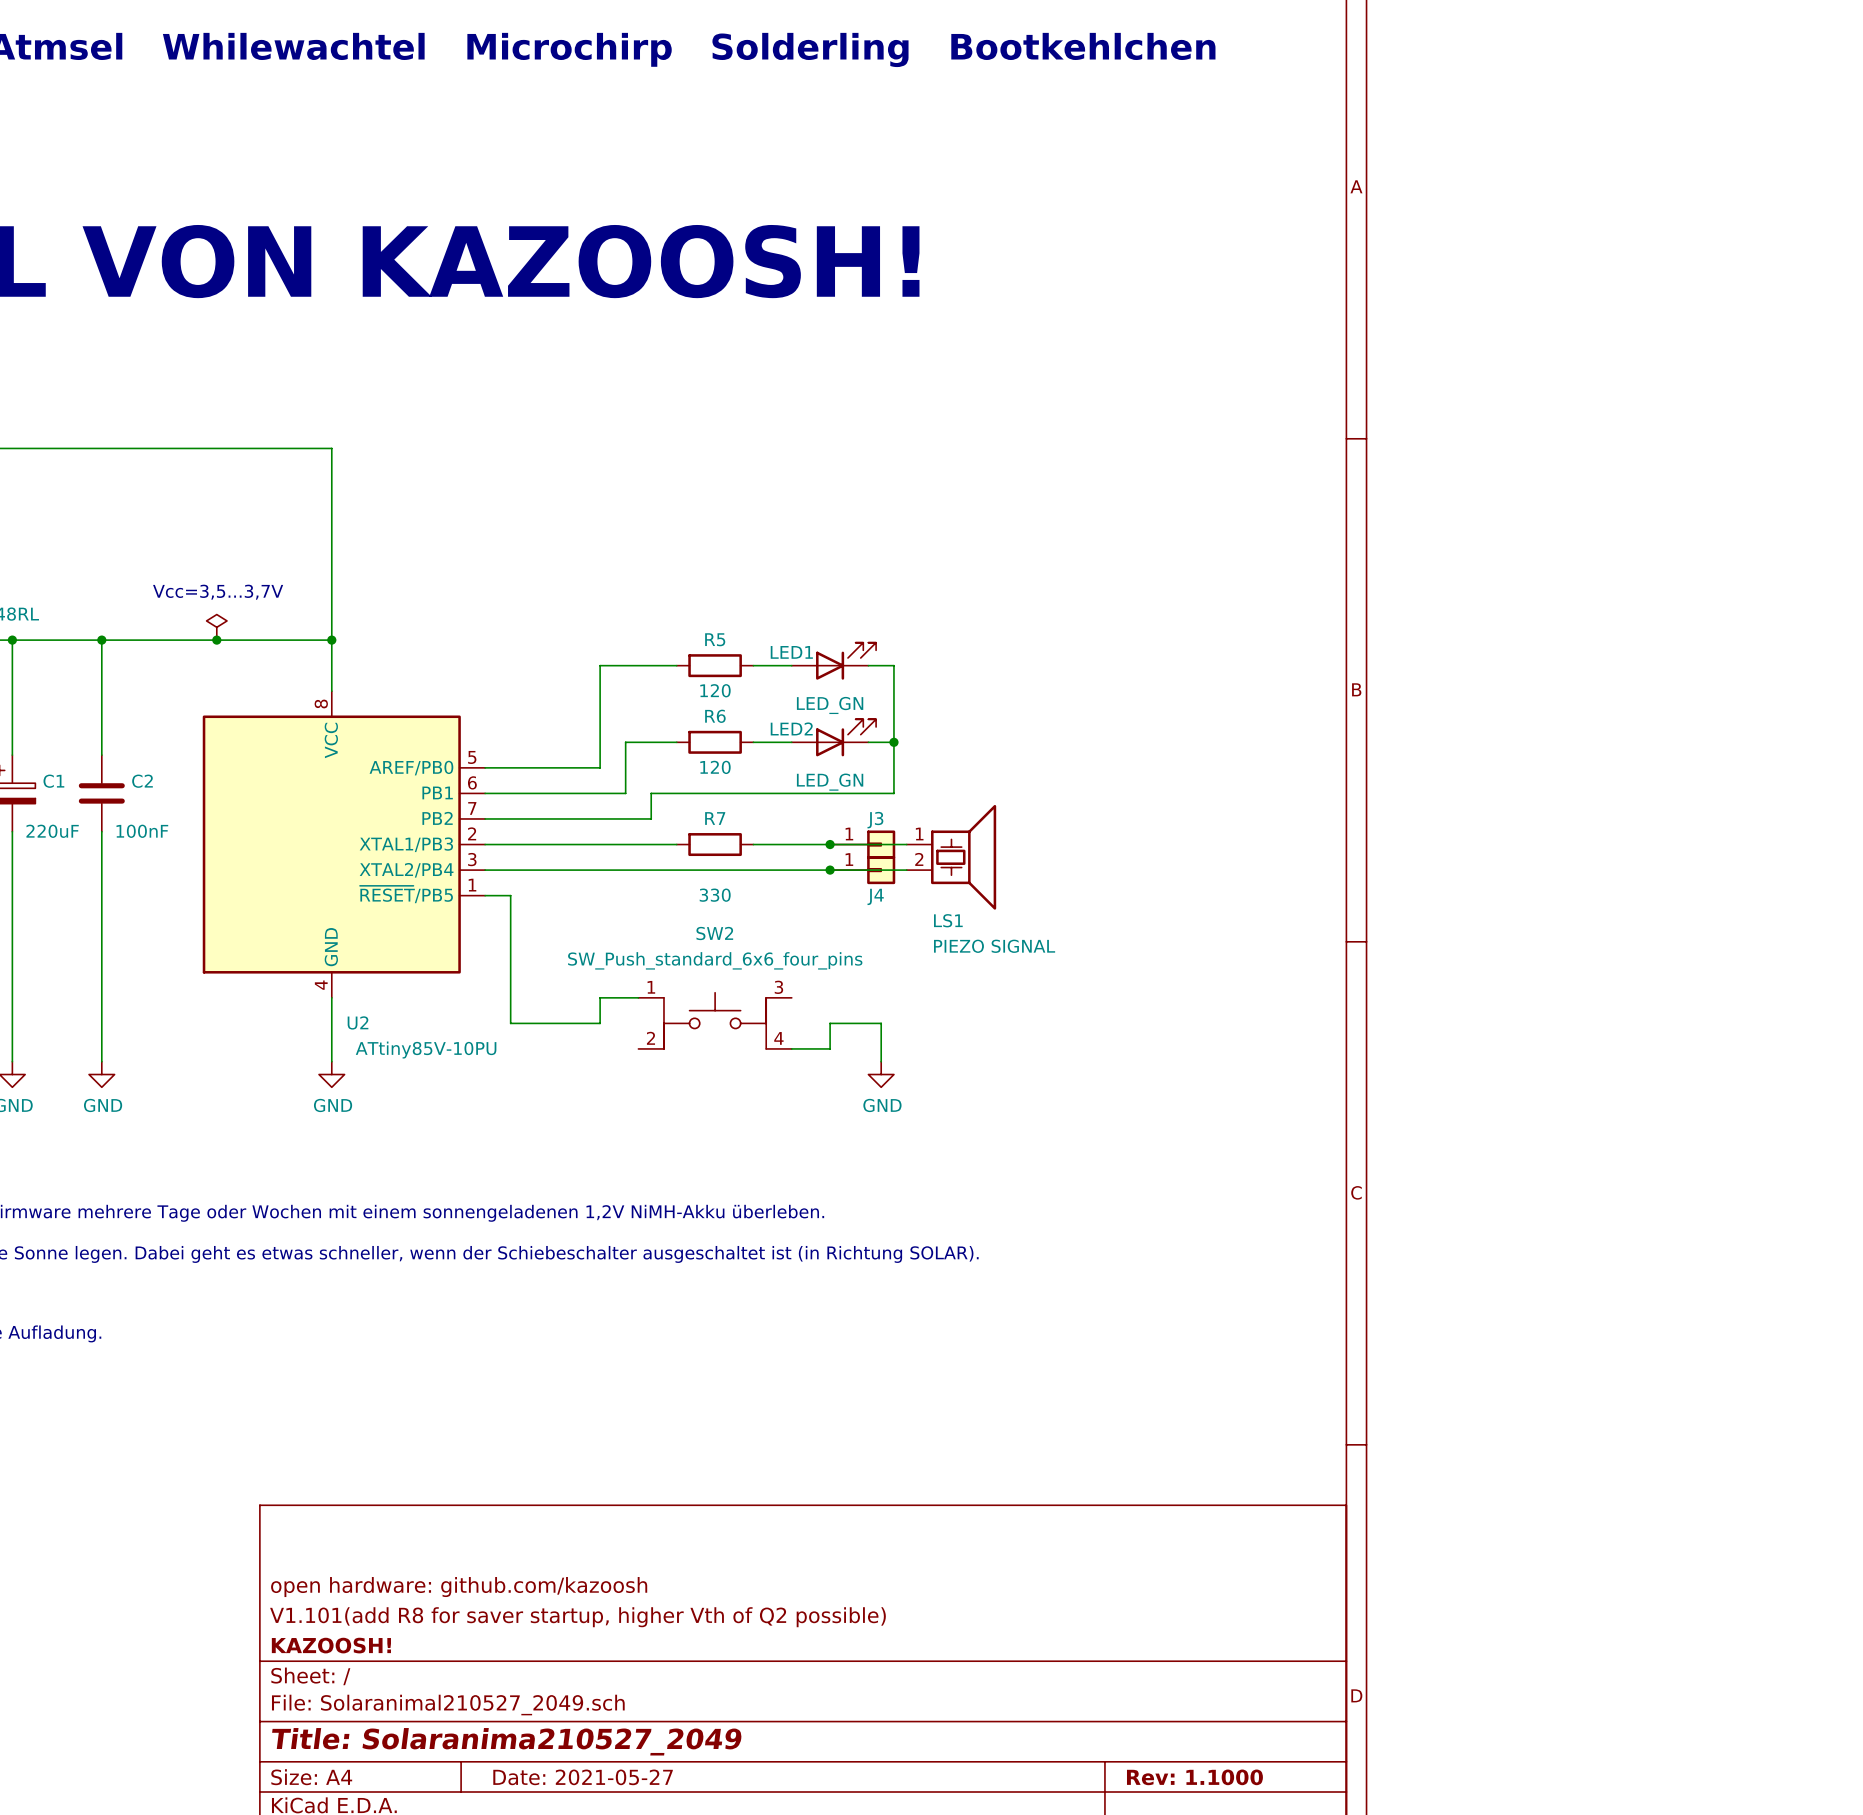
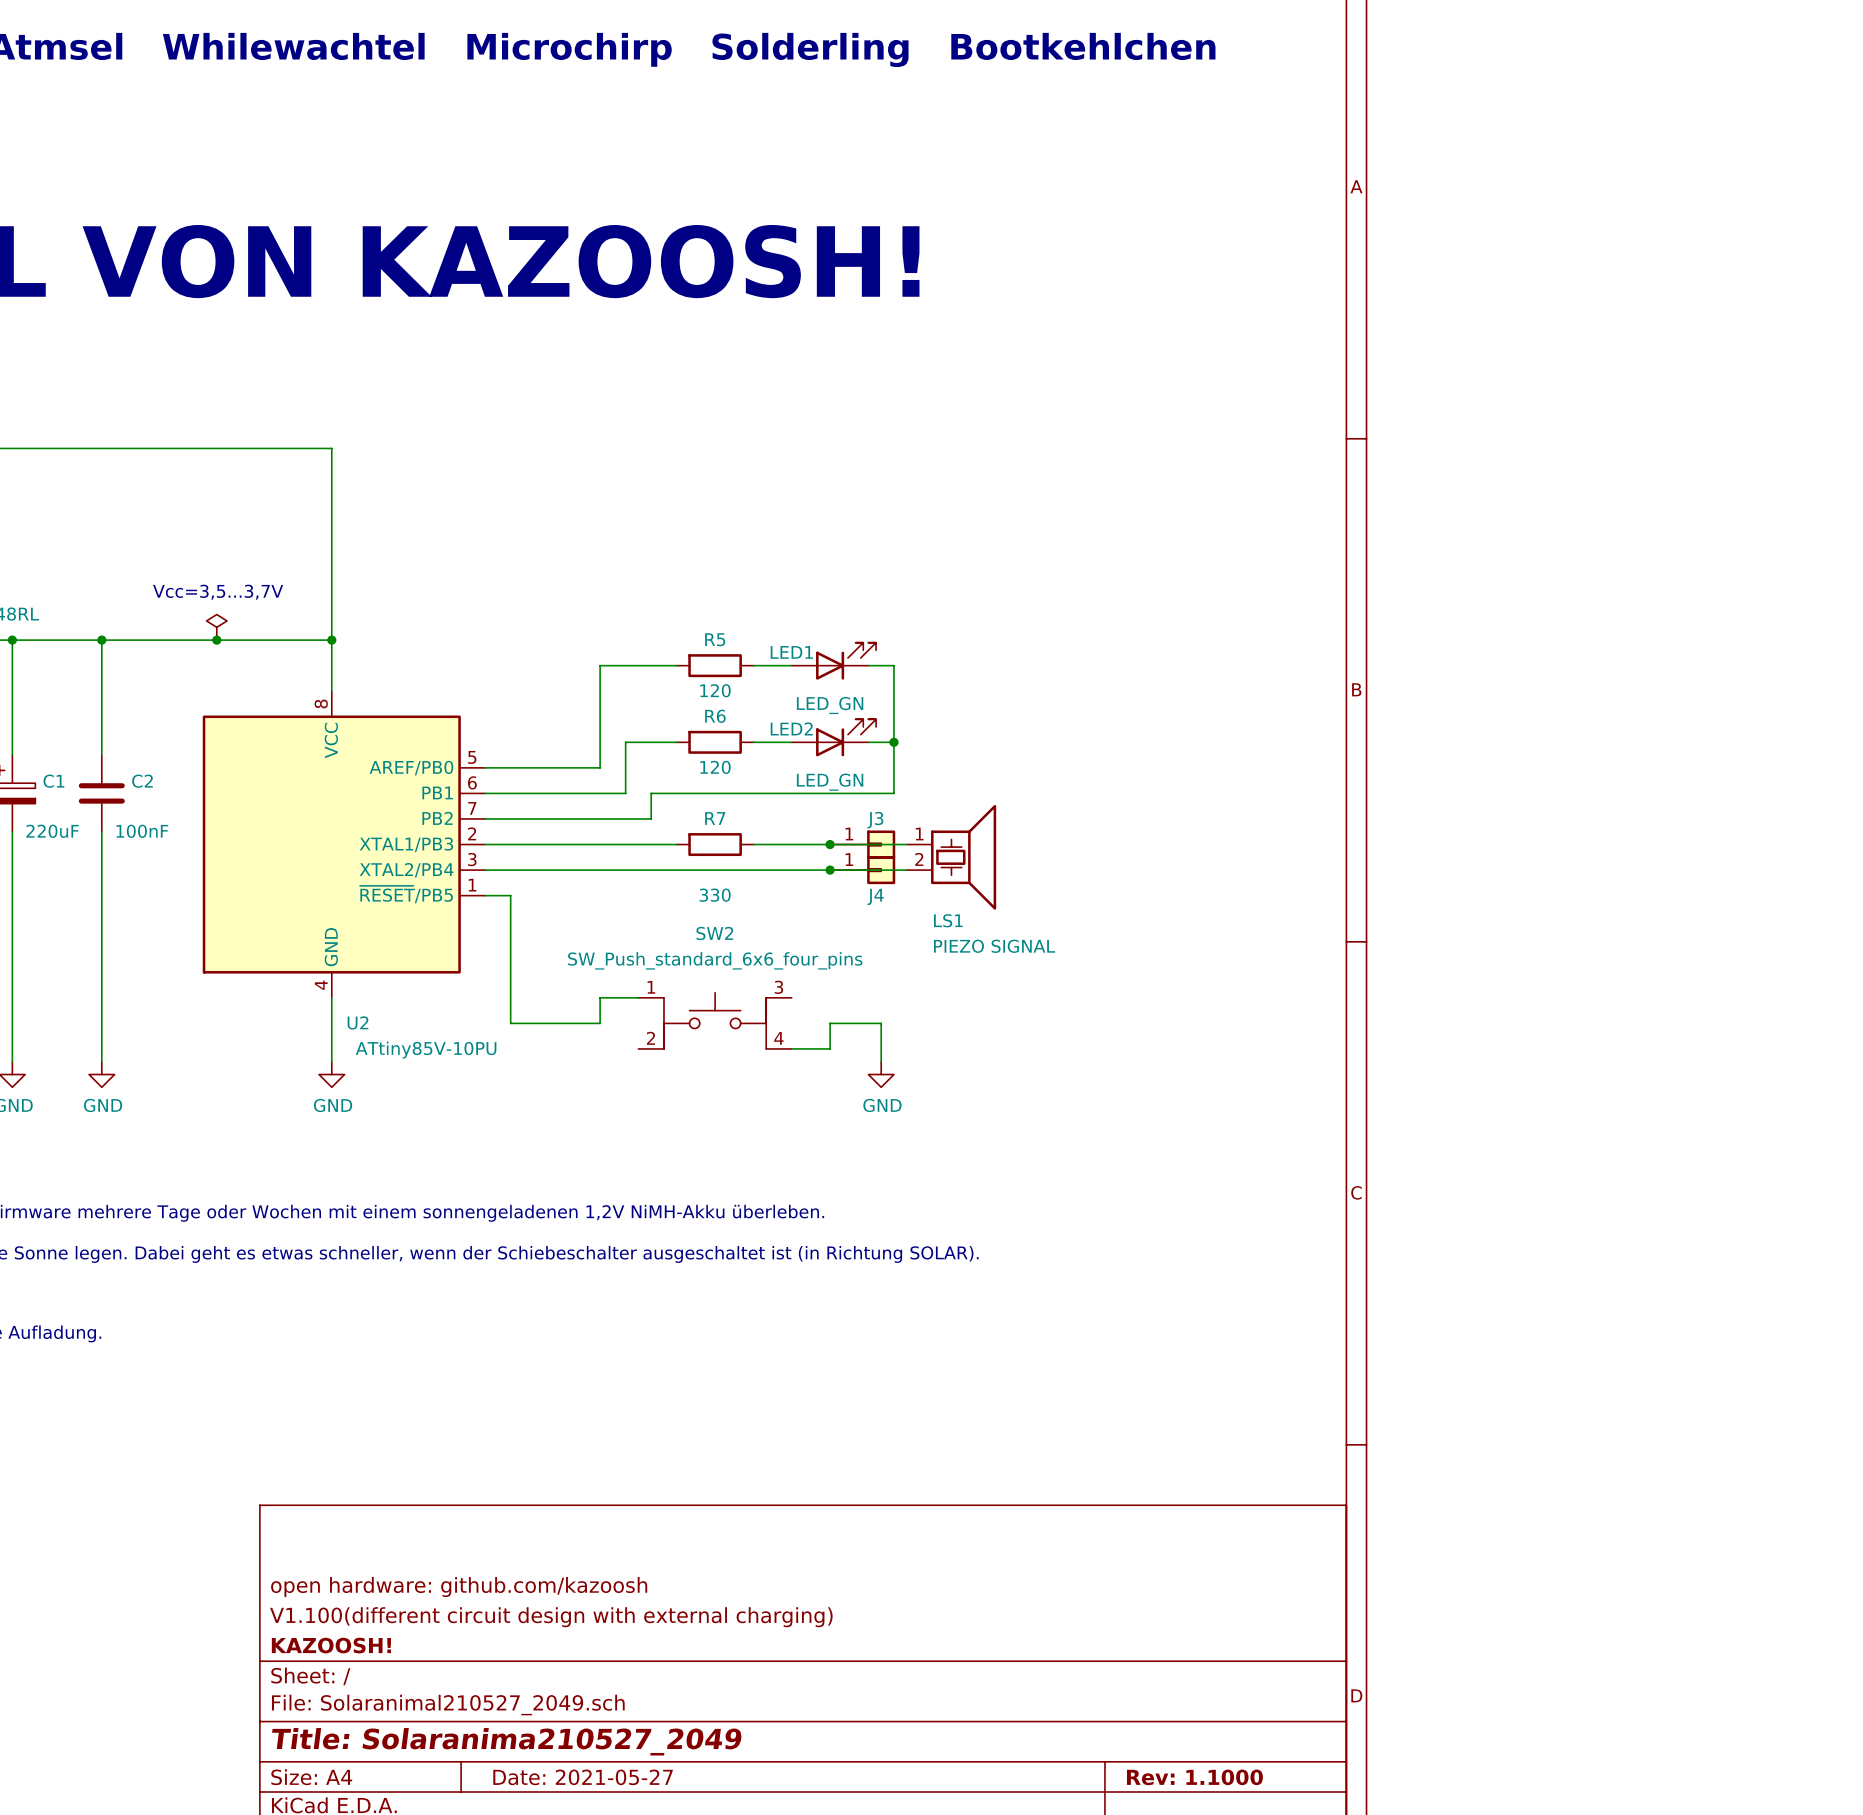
title block: V1.101(add R8 for saver startup, higher Vth of Q2 possible) (577, 1617) -> V1.100(different circuit design with external charging) (551, 1617)

